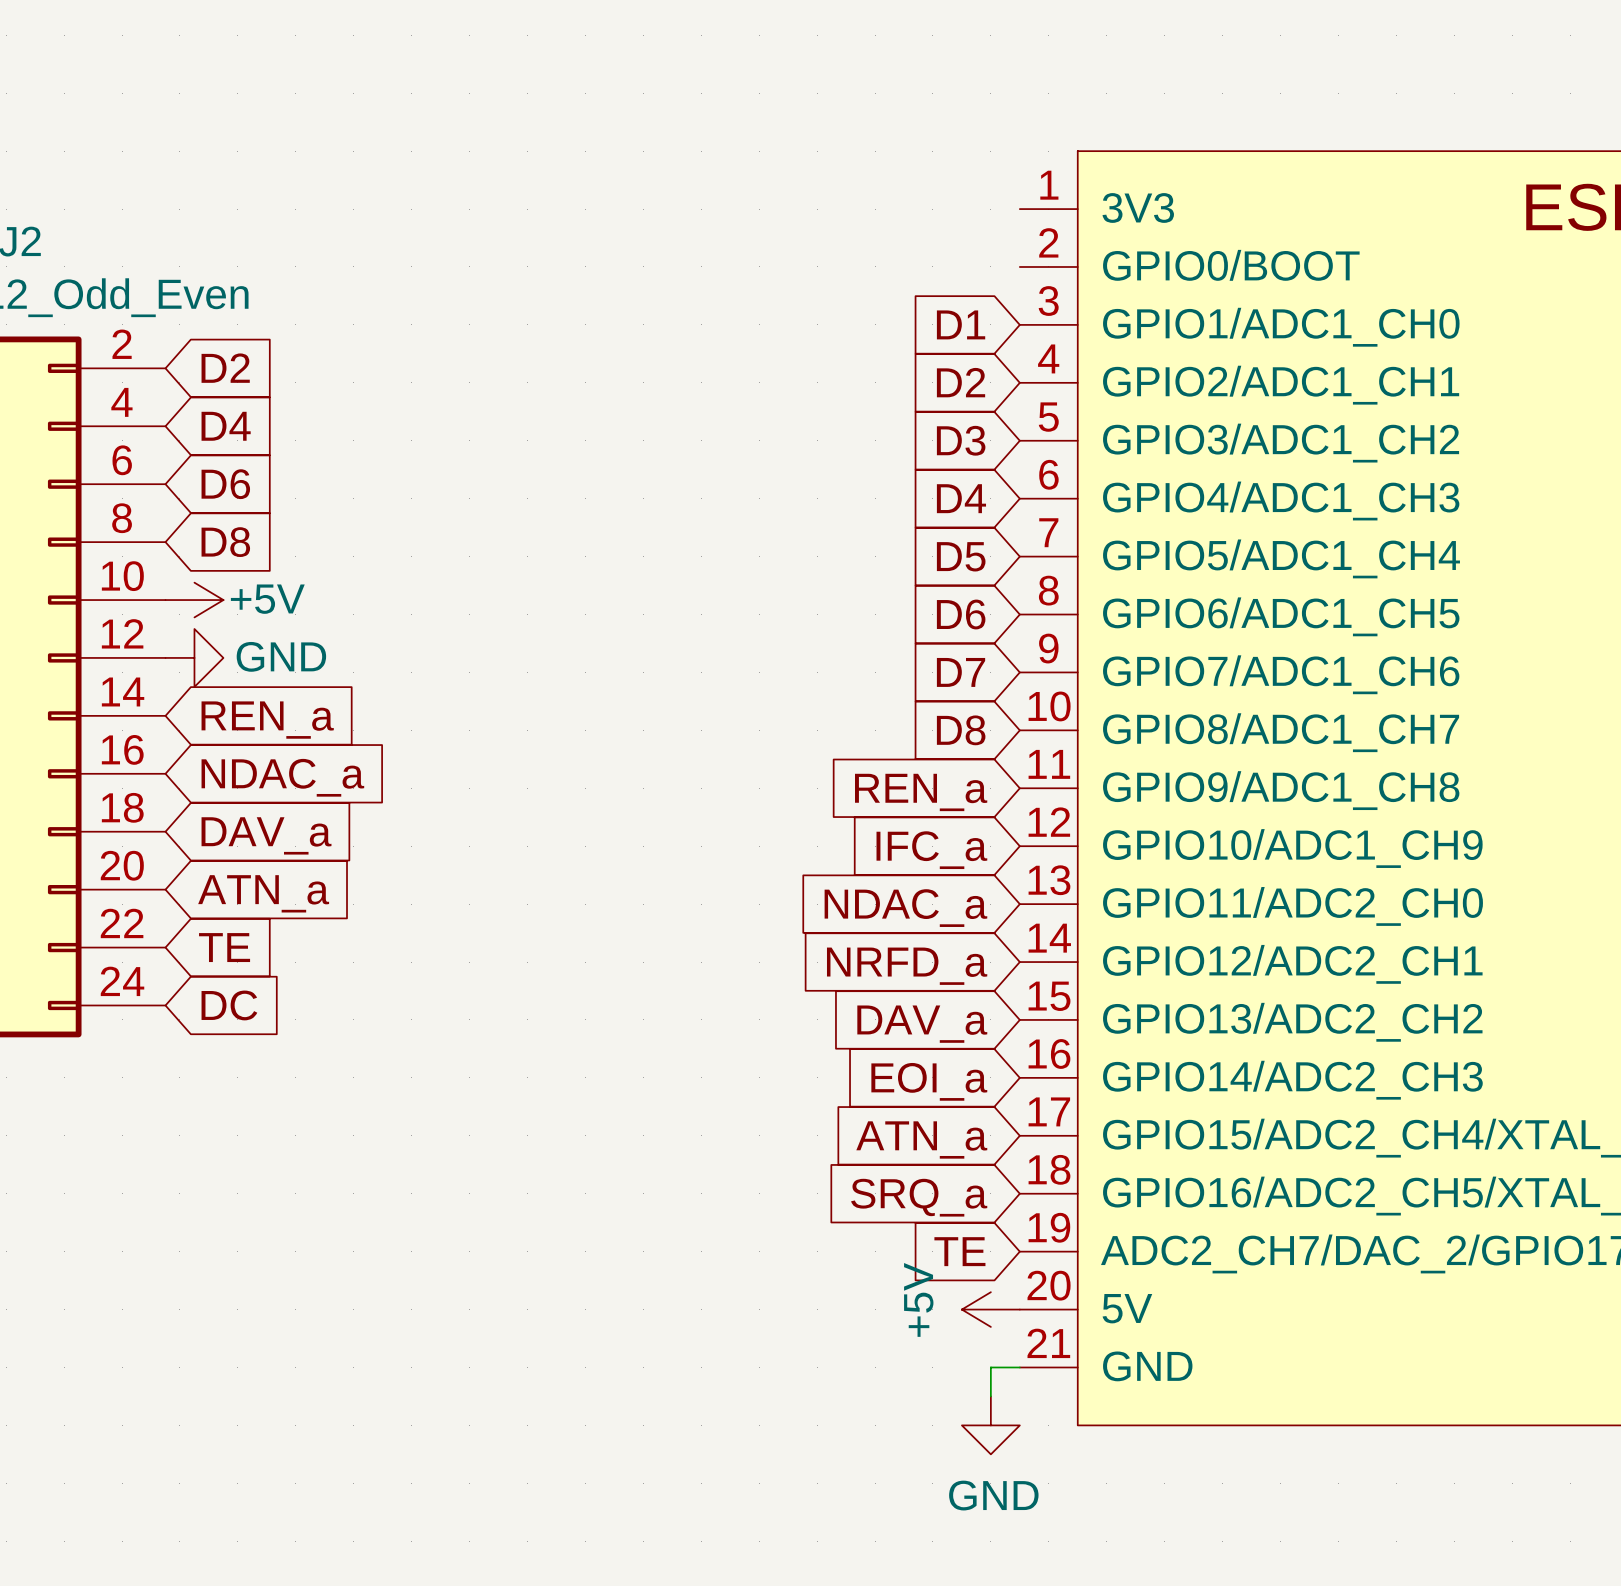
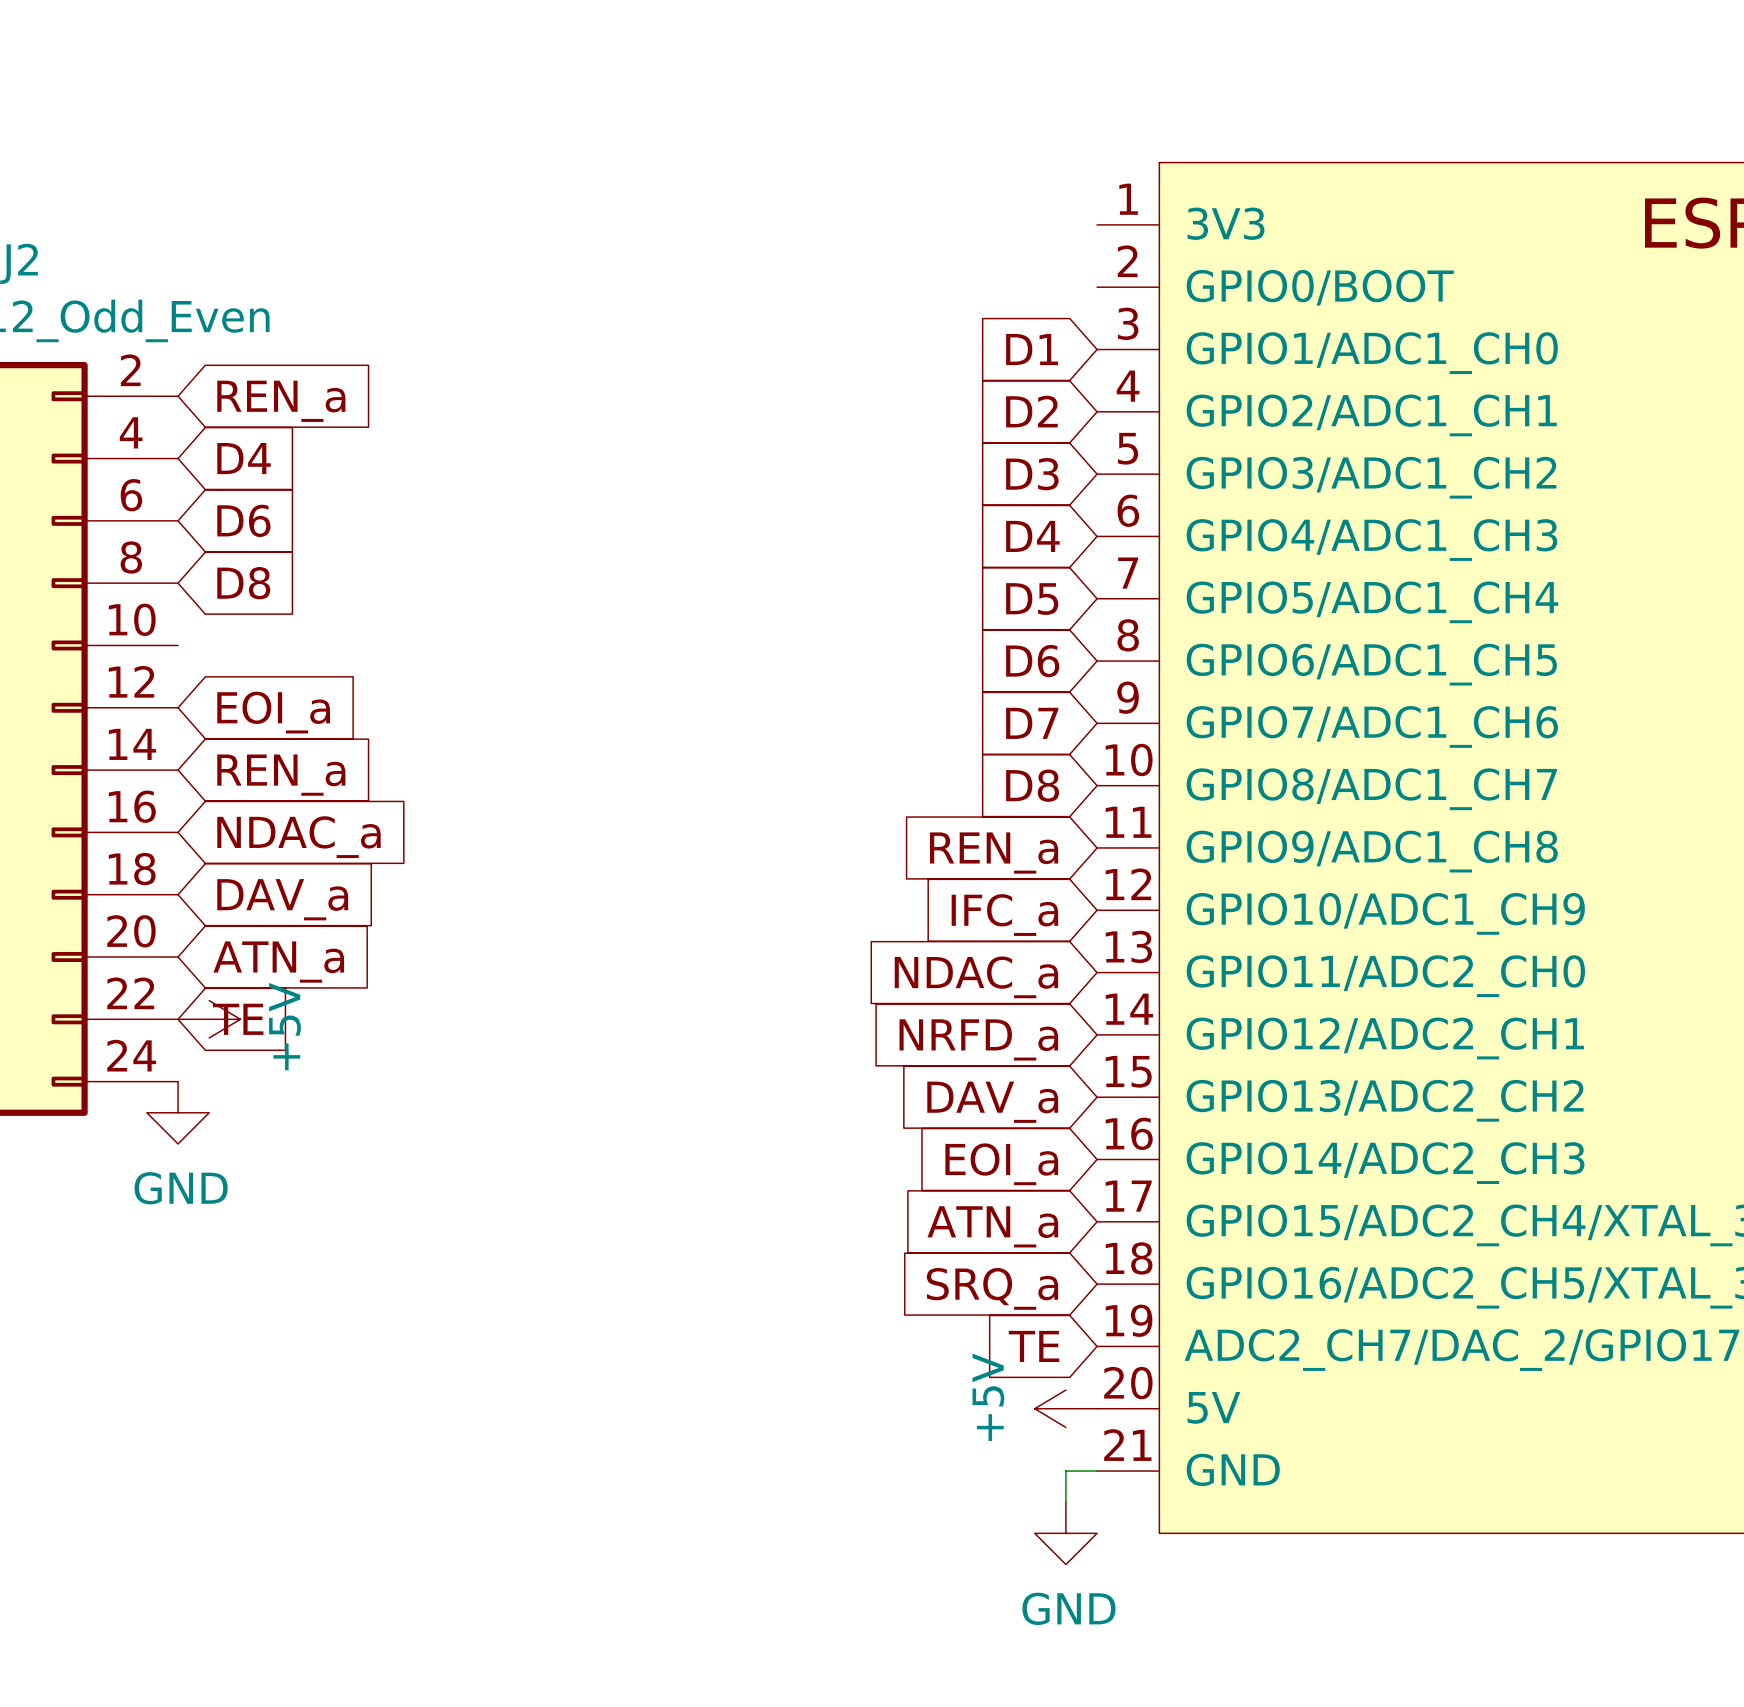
global label: D2 (225, 368) -> REN_a (281, 401)
power symbol text rotation: 0° (267, 599) -> 90° counterclockwise (284, 1026)
power symbol position: +5V (194, 600) -> +5V (209, 1019)
power symbol rotation: 0° (194, 657) -> 90° clockwise (178, 1112)
power symbol position: GND (194, 657) -> GND (178, 1112)
global label: none -> EOI_a (273, 712)
global label: DC (229, 1005) -> none

